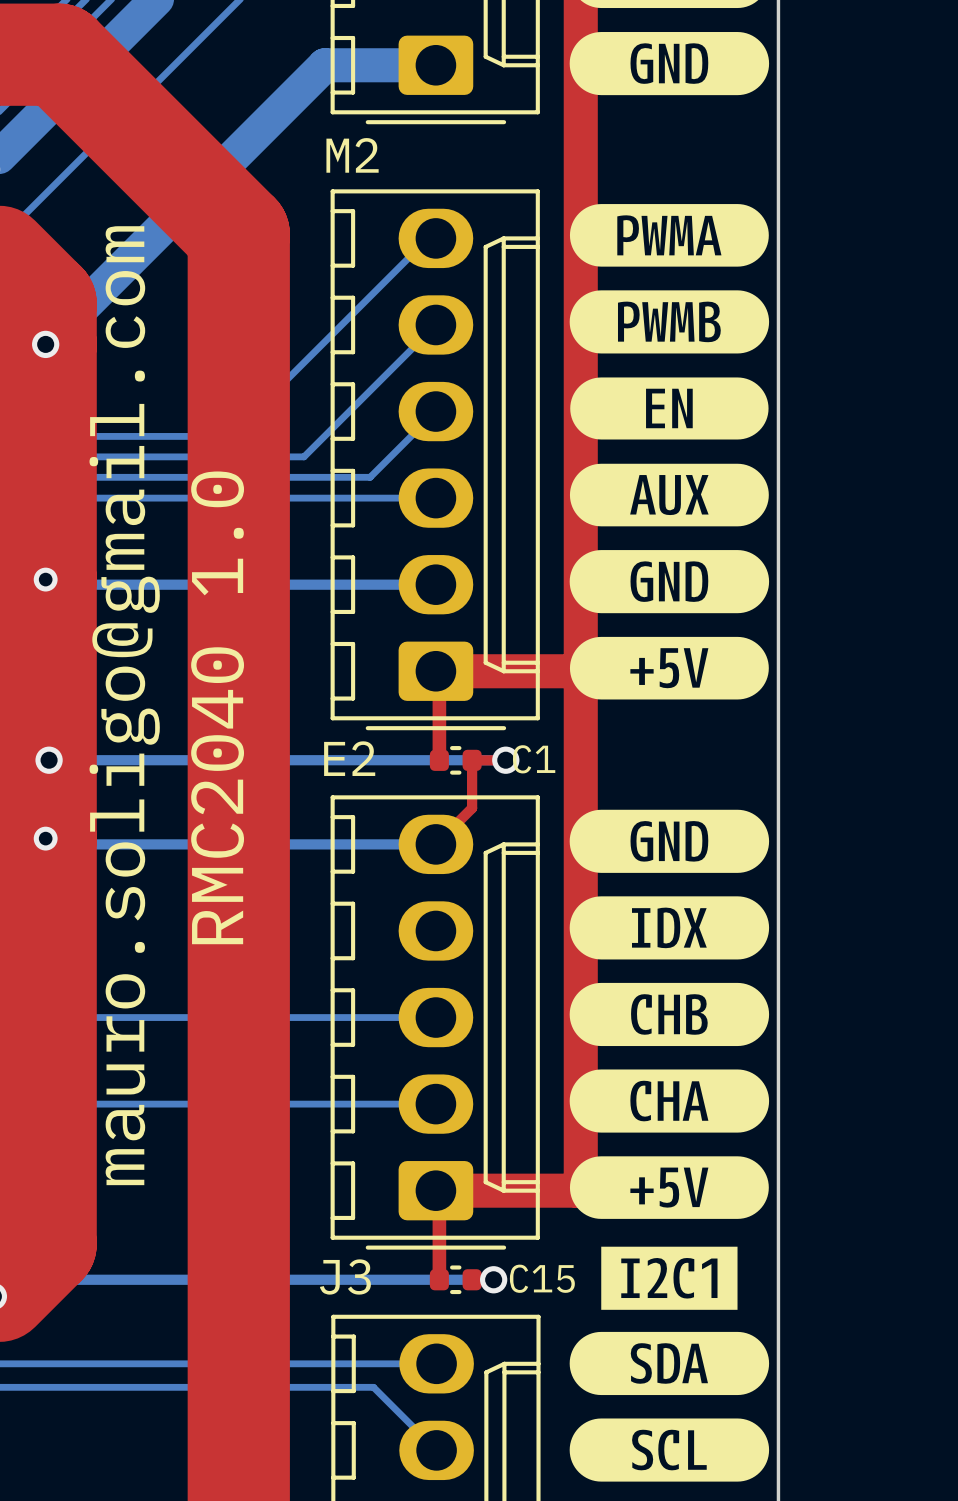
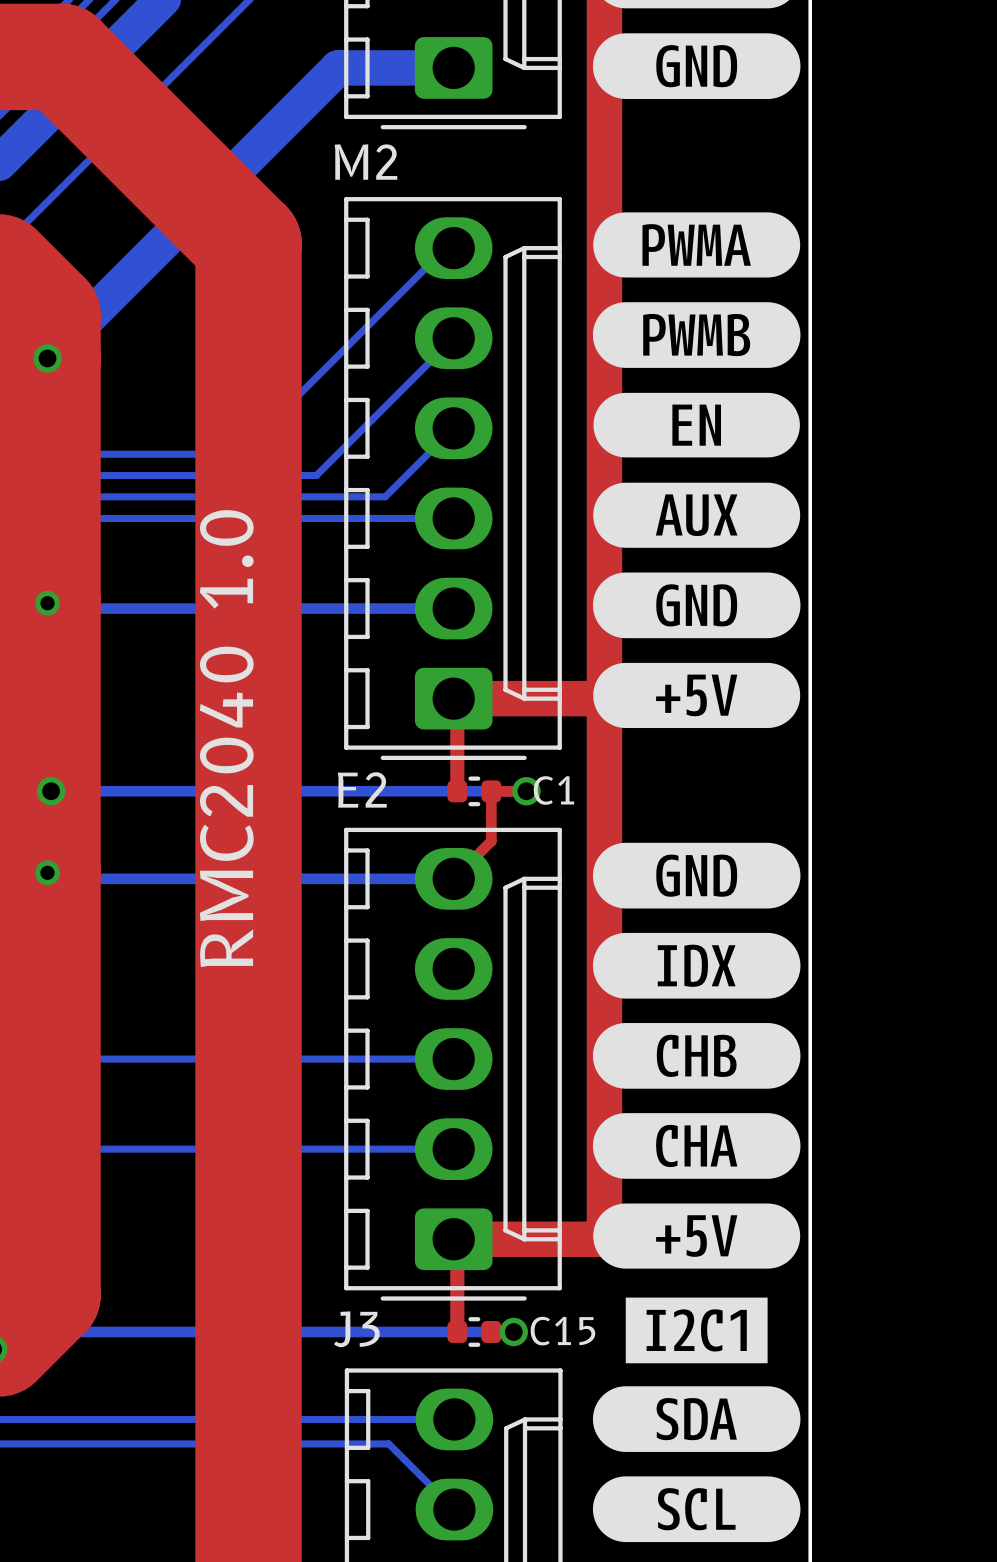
text: mauro.soligo@gmail.com (124, 705) -> none

